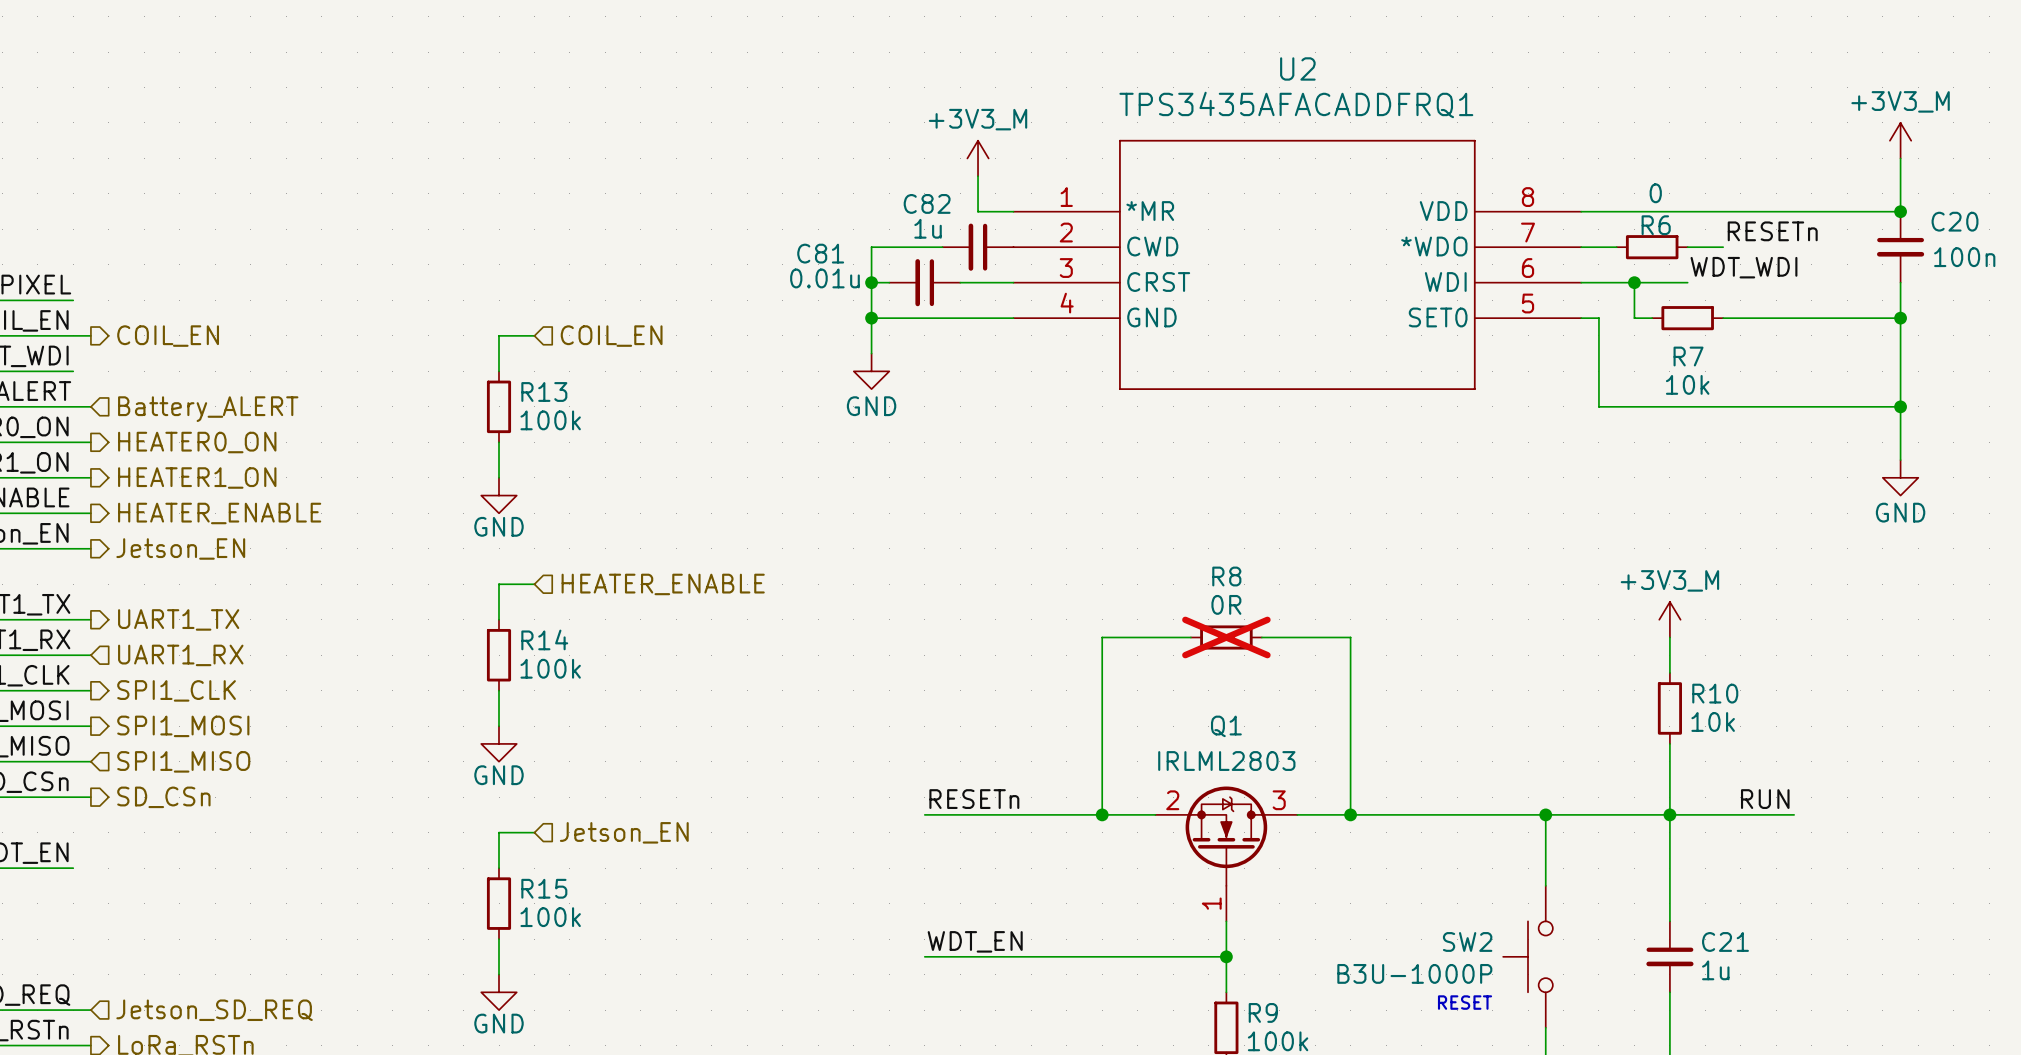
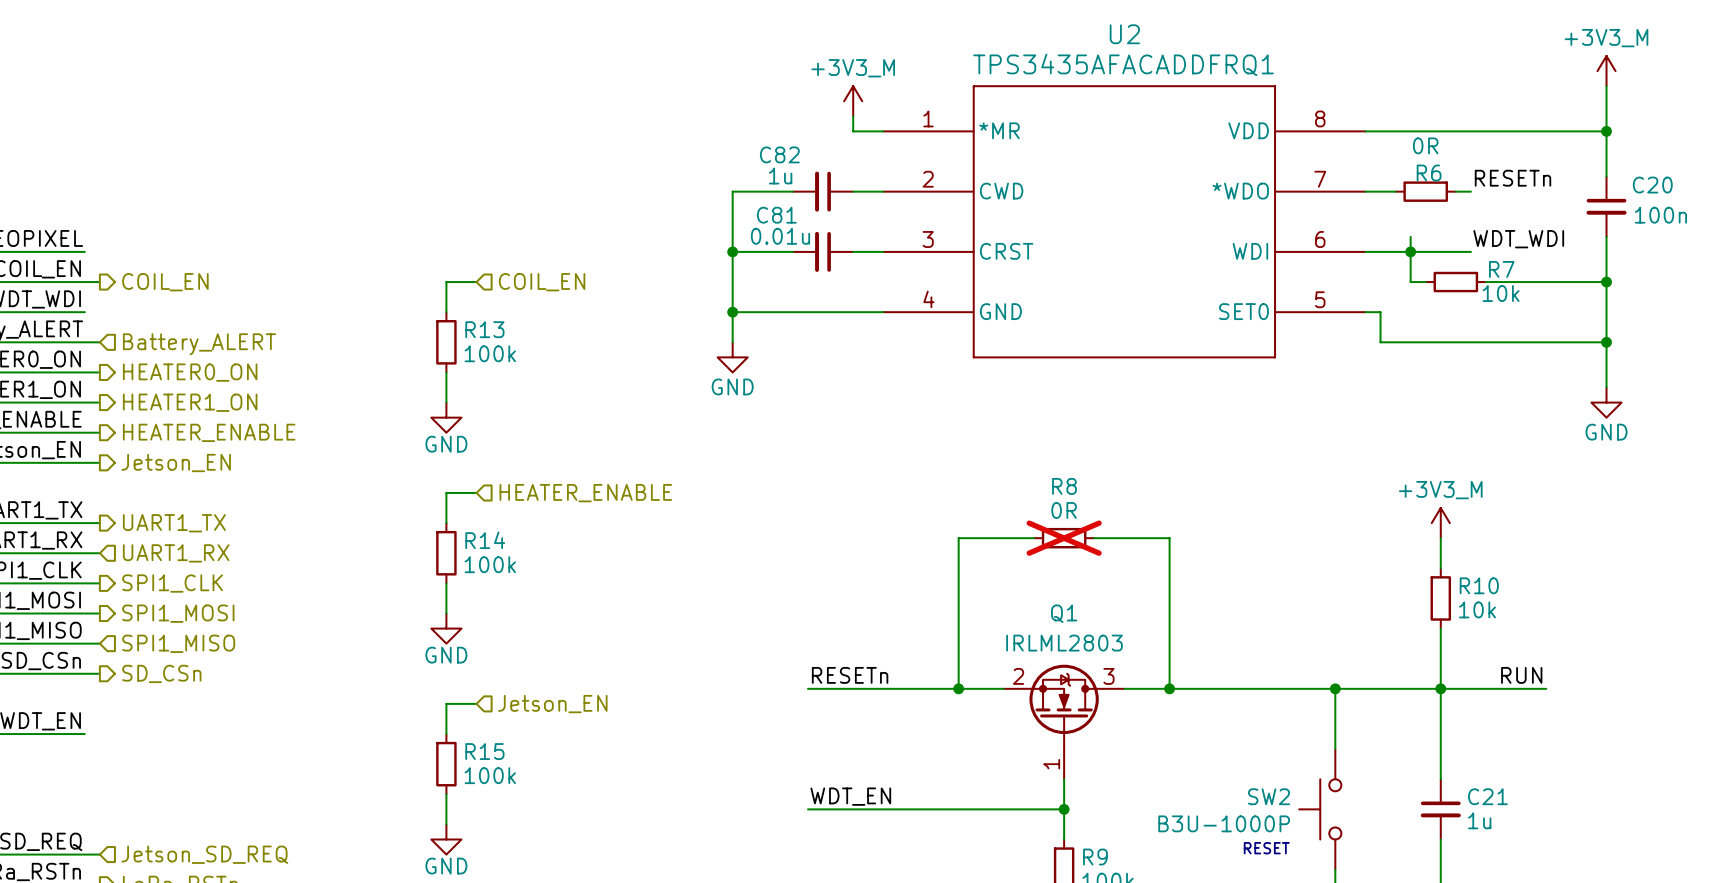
wire: none -> (1606, 86) (1606, 176)
U2 symbol: [1013, 139, 1582, 390] -> [883, 85, 1366, 359]
wire: none -> (853, 116) (853, 131) (883, 131)
power symbol position: +3V3_M (1900, 140) -> +3V3_M (1606, 71)
power symbol position: +3V3_M (978, 158) -> +3V3_M (853, 101)
wire: none -> (1365, 131) (1606, 131)
wire: (1900, 158) (1900, 211) (1581, 211) -> none
wire: (978, 176) (978, 211) (1013, 211) -> none
R6 value: 0 (1655, 193) -> 0R (1425, 145)
junction position: (1900, 211) -> (1606, 131)
wire: none -> (792, 191) (732, 191) (732, 342)
wire: none -> (853, 191) (883, 191)
wire: none -> (1455, 191) (1470, 191)
label position: RESETn (1772, 231) -> RESETn (1513, 178)
wire: (942, 247) (871, 247) (871, 353) -> none
C82 position: (978, 247) -> (823, 191)
wire: (1581, 247) (1616, 247) -> (1365, 191) (1395, 191)
R6 position: (1652, 247) -> (1425, 191)
wire: (1687, 247) (1723, 247) -> none
C20 position: (1900, 247) -> (1606, 206)
C81 name position: C81 (820, 253) -> C81 (776, 215)
label position: WDT_WDI (1743, 267) -> WDT_WDI (1518, 239)
C81 value position: 0.01u (824, 278) -> 0.01u (780, 236)
wire: (871, 282) (889, 282) -> none
junction: (871, 282) -> none
C81 position: (924, 282) -> (823, 251)
wire: (960, 282) (1013, 282) -> none
wire: (1581, 282) (1687, 282) -> none
junction position: (1634, 282) -> (1410, 251)
wire: (1900, 282) (1900, 460) -> (1606, 236) (1606, 387)
wire: none -> (732, 251) (792, 251)
junction: none -> (732, 251)
wire: none -> (853, 251) (883, 251)
wire: none -> (1365, 251) (1470, 251)
wire: (871, 318) (1013, 318) -> none
junction: (871, 318) -> none
wire: (1581, 318) (1598, 318) (1598, 371) -> (1365, 312) (1380, 312)
wire: (1634, 318) (1652, 318) -> (1410, 266) (1410, 282) (1425, 282)
R7 position: (1687, 318) -> (1455, 282)
wire: (1723, 318) (1900, 318) -> none
junction: (1900, 318) -> none
wire: none -> (1485, 282) (1606, 282)
junction: none -> (1606, 282)
R7 name position: R7 (1688, 356) -> R7 (1501, 269)
wire: none -> (732, 312) (883, 312)
junction: none -> (732, 312)
power symbol position: GND (871, 371) -> GND (732, 357)
R7 value position: 10k (1687, 384) -> 10k (1501, 293)
wire: (1865, 406) (1900, 406) -> none
junction position: (1900, 406) -> (1606, 342)
power symbol position: GND (1900, 477) -> GND (1606, 402)

